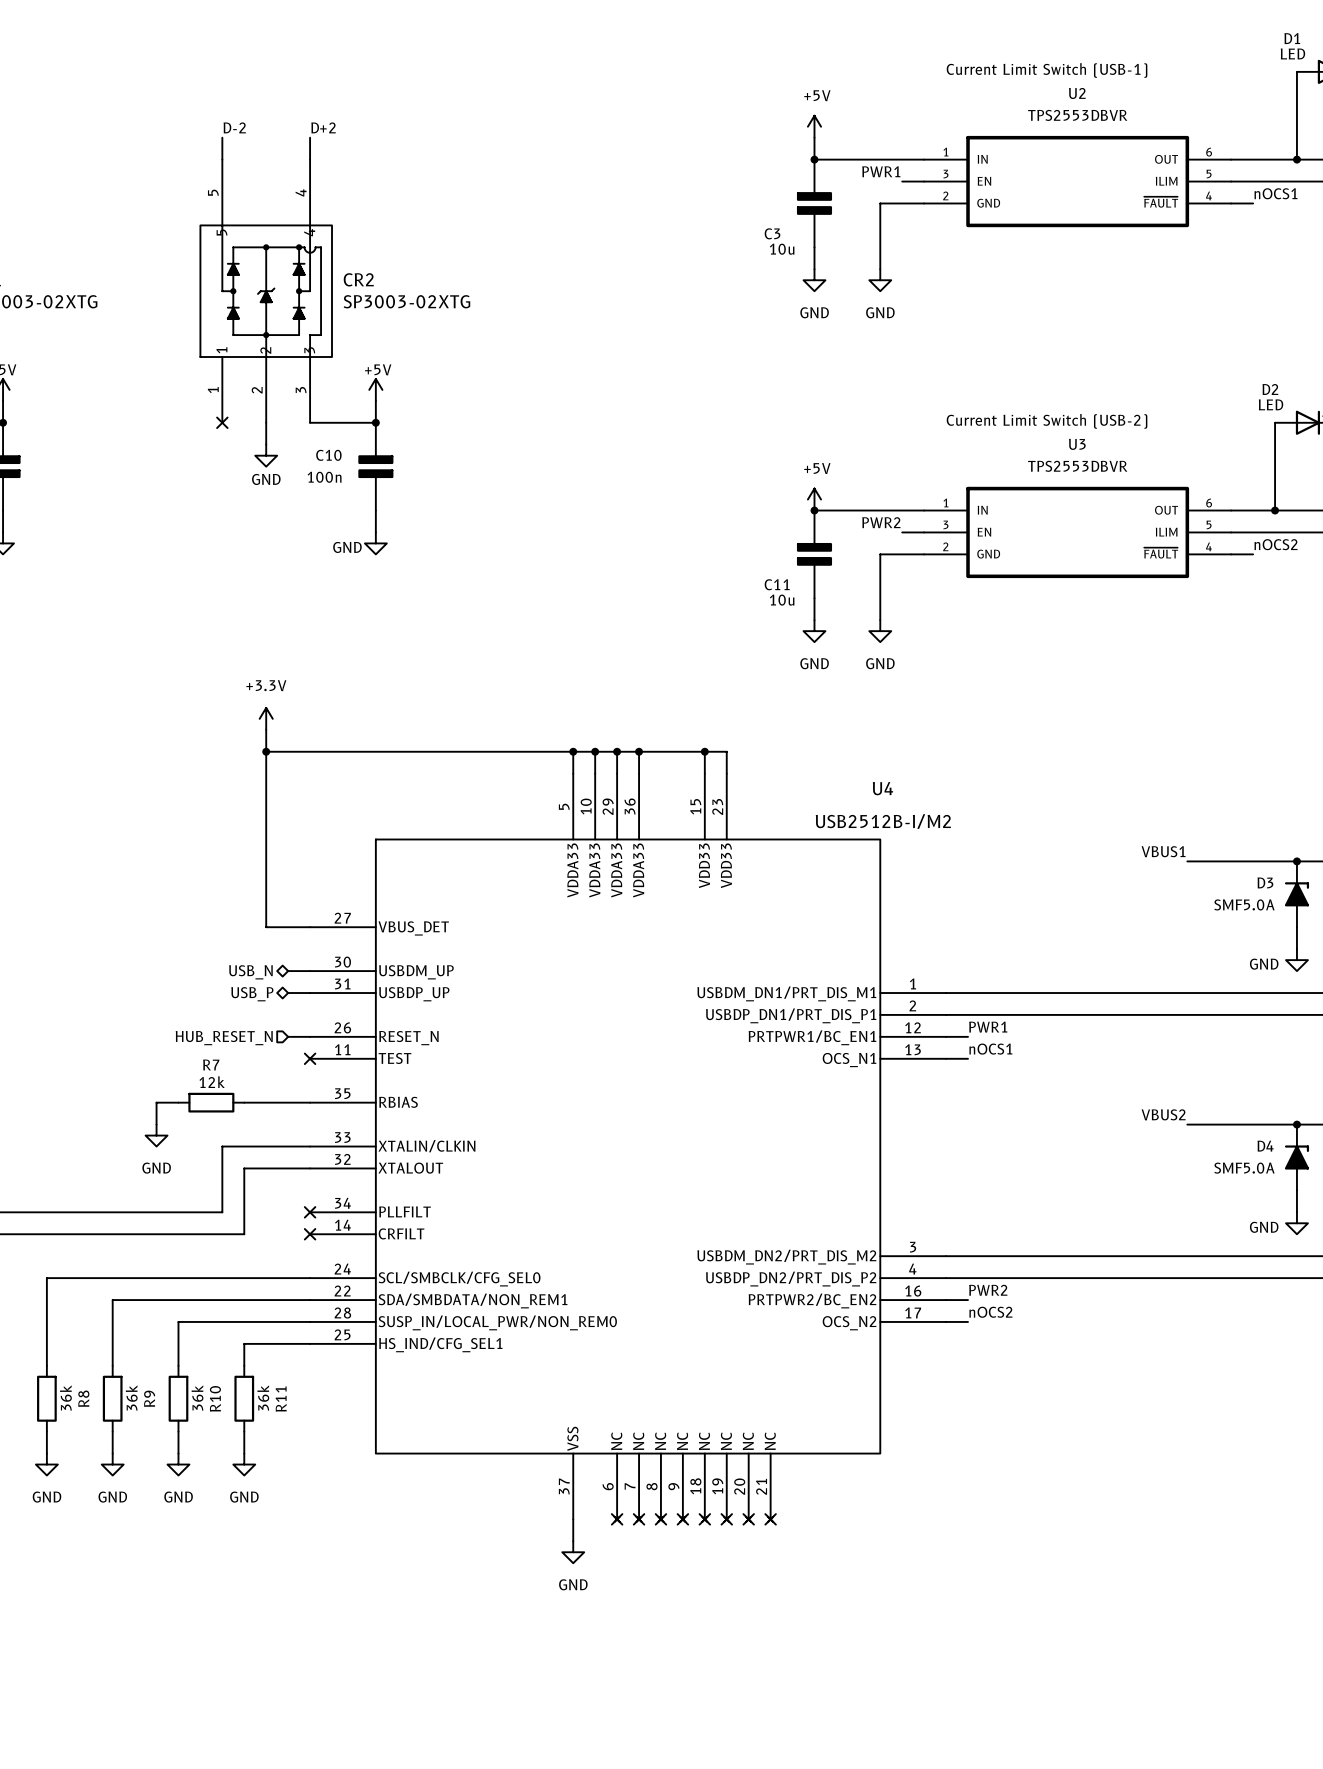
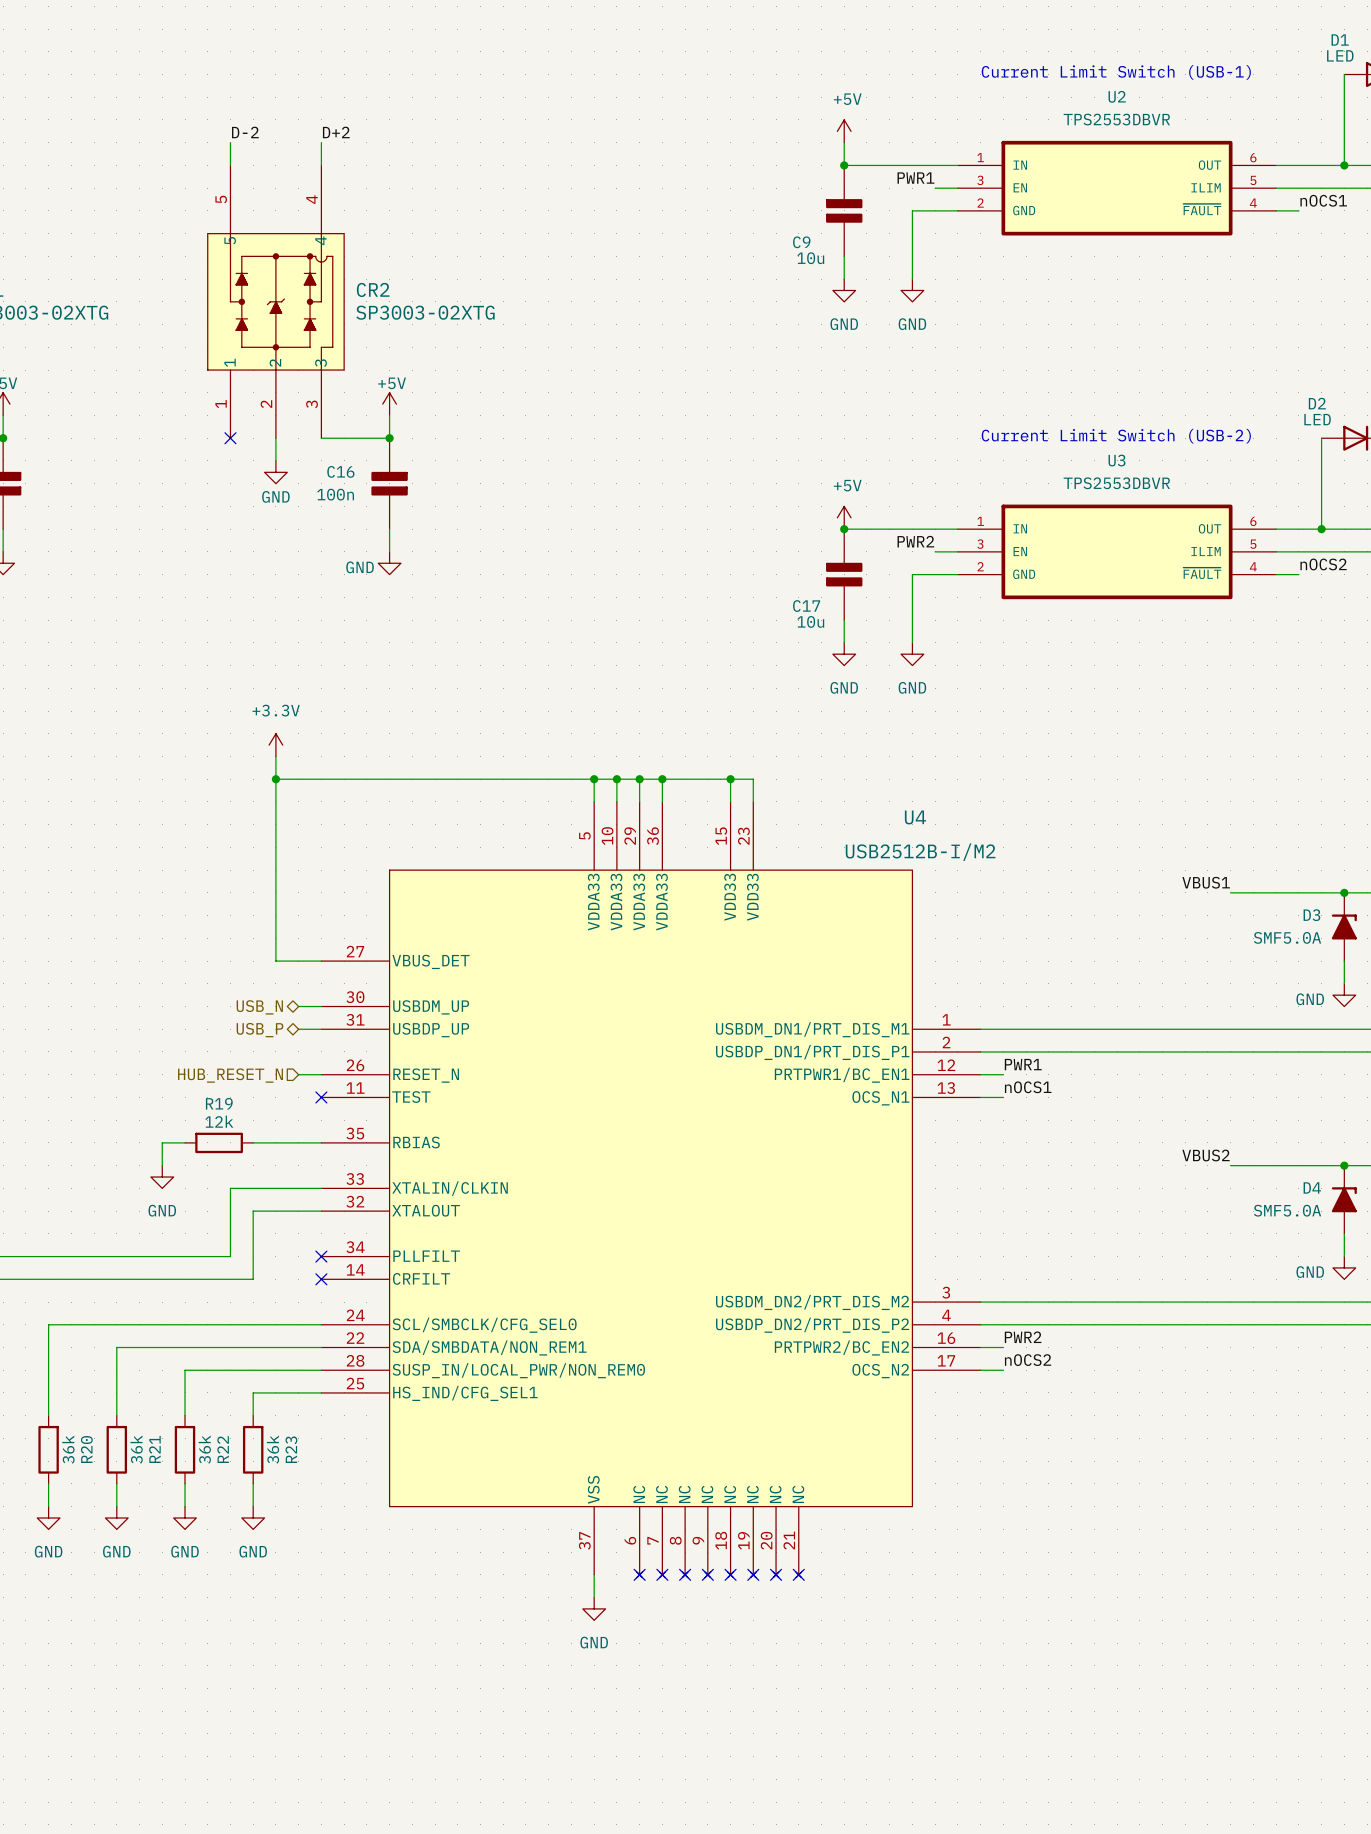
C3 name: C3 (772, 233) -> C9 (801, 242)
C10 name: C10 (328, 455) -> C16 (340, 471)
C11 name: C11 (777, 584) -> C17 (806, 606)
R7 name: R7 (211, 1065) -> R19 (219, 1103)
R8 name: R8 (83, 1398) -> R20 (86, 1449)
R9 name: R9 (149, 1398) -> R21 (154, 1449)
R10 name: R10 (215, 1398) -> R22 (223, 1449)
R11 name: R11 (281, 1399) -> R23 (291, 1449)

